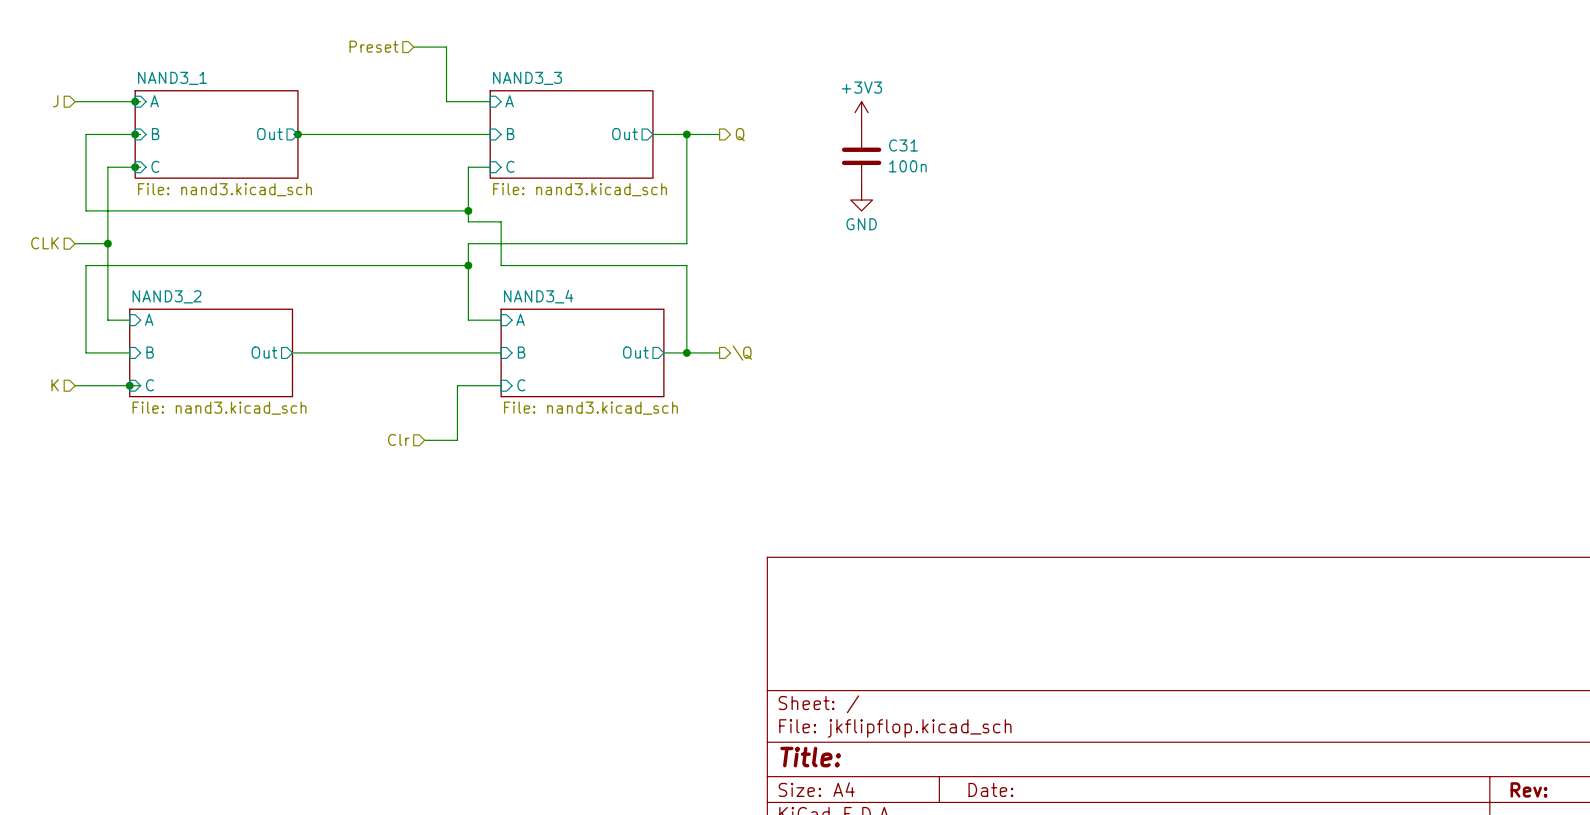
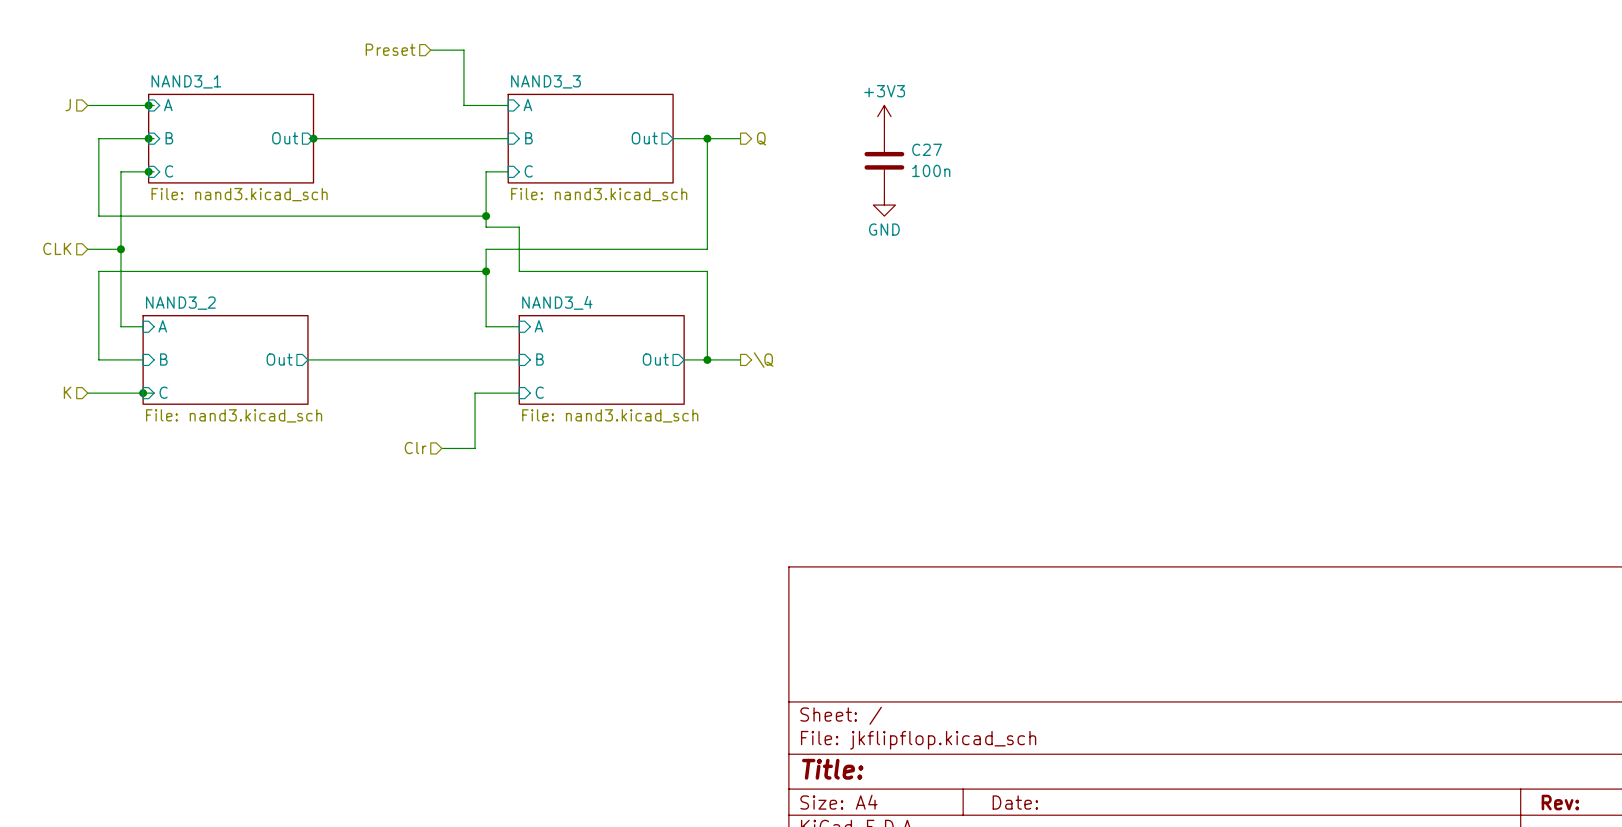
C31 name: C31 (903, 145) -> C27 (927, 149)

